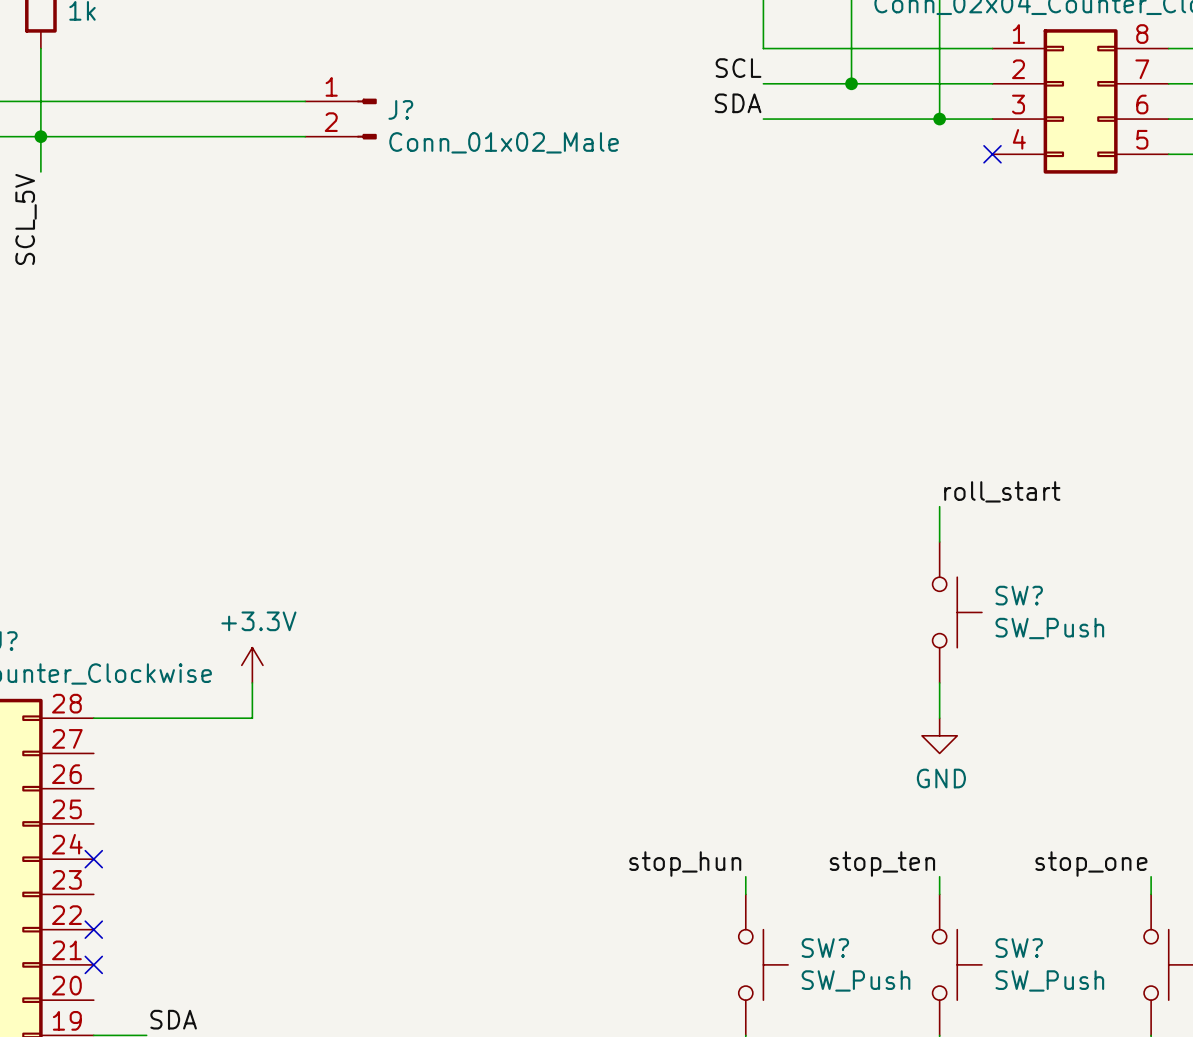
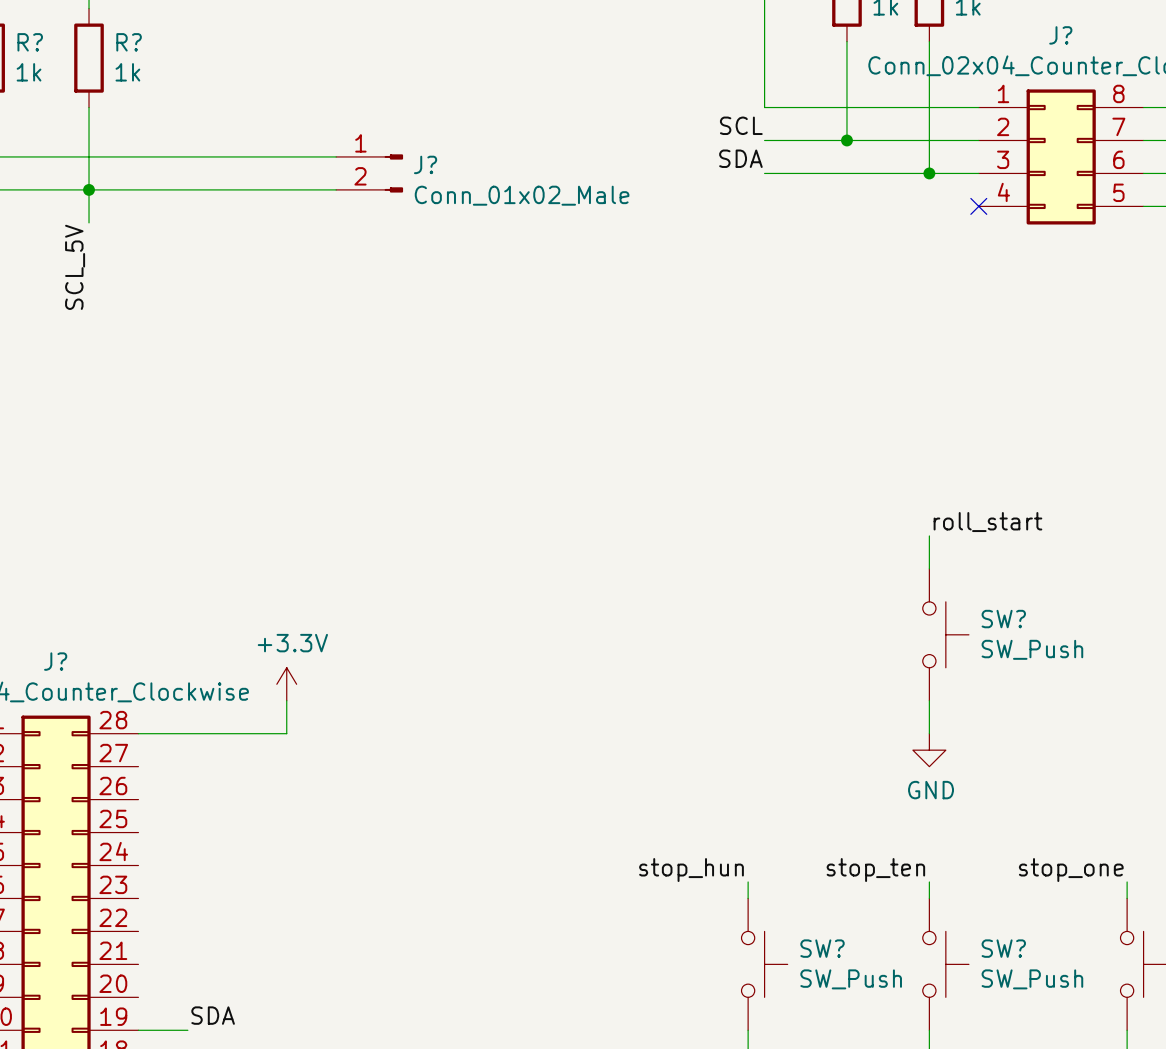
no-connect mark: (93, 859) -> none
no-connect mark: (93, 929) -> none
no-connect mark: (93, 964) -> none

